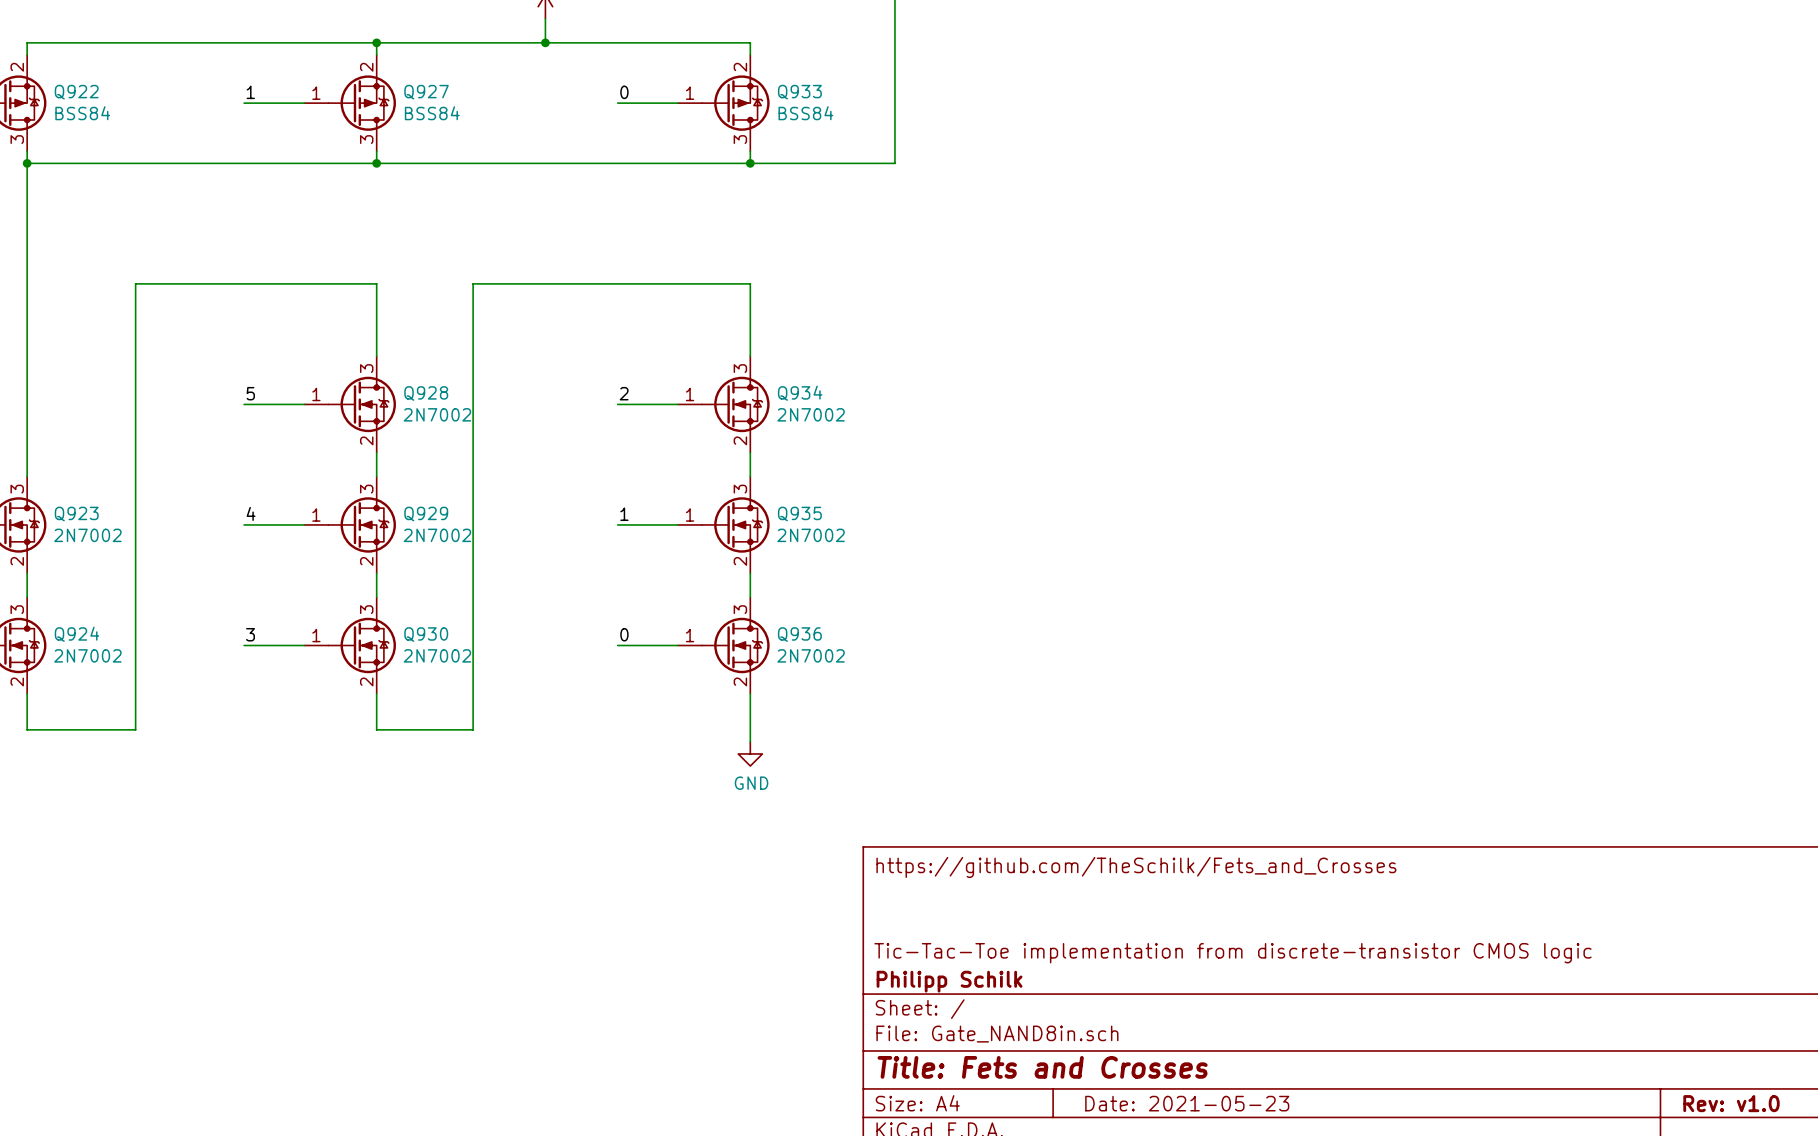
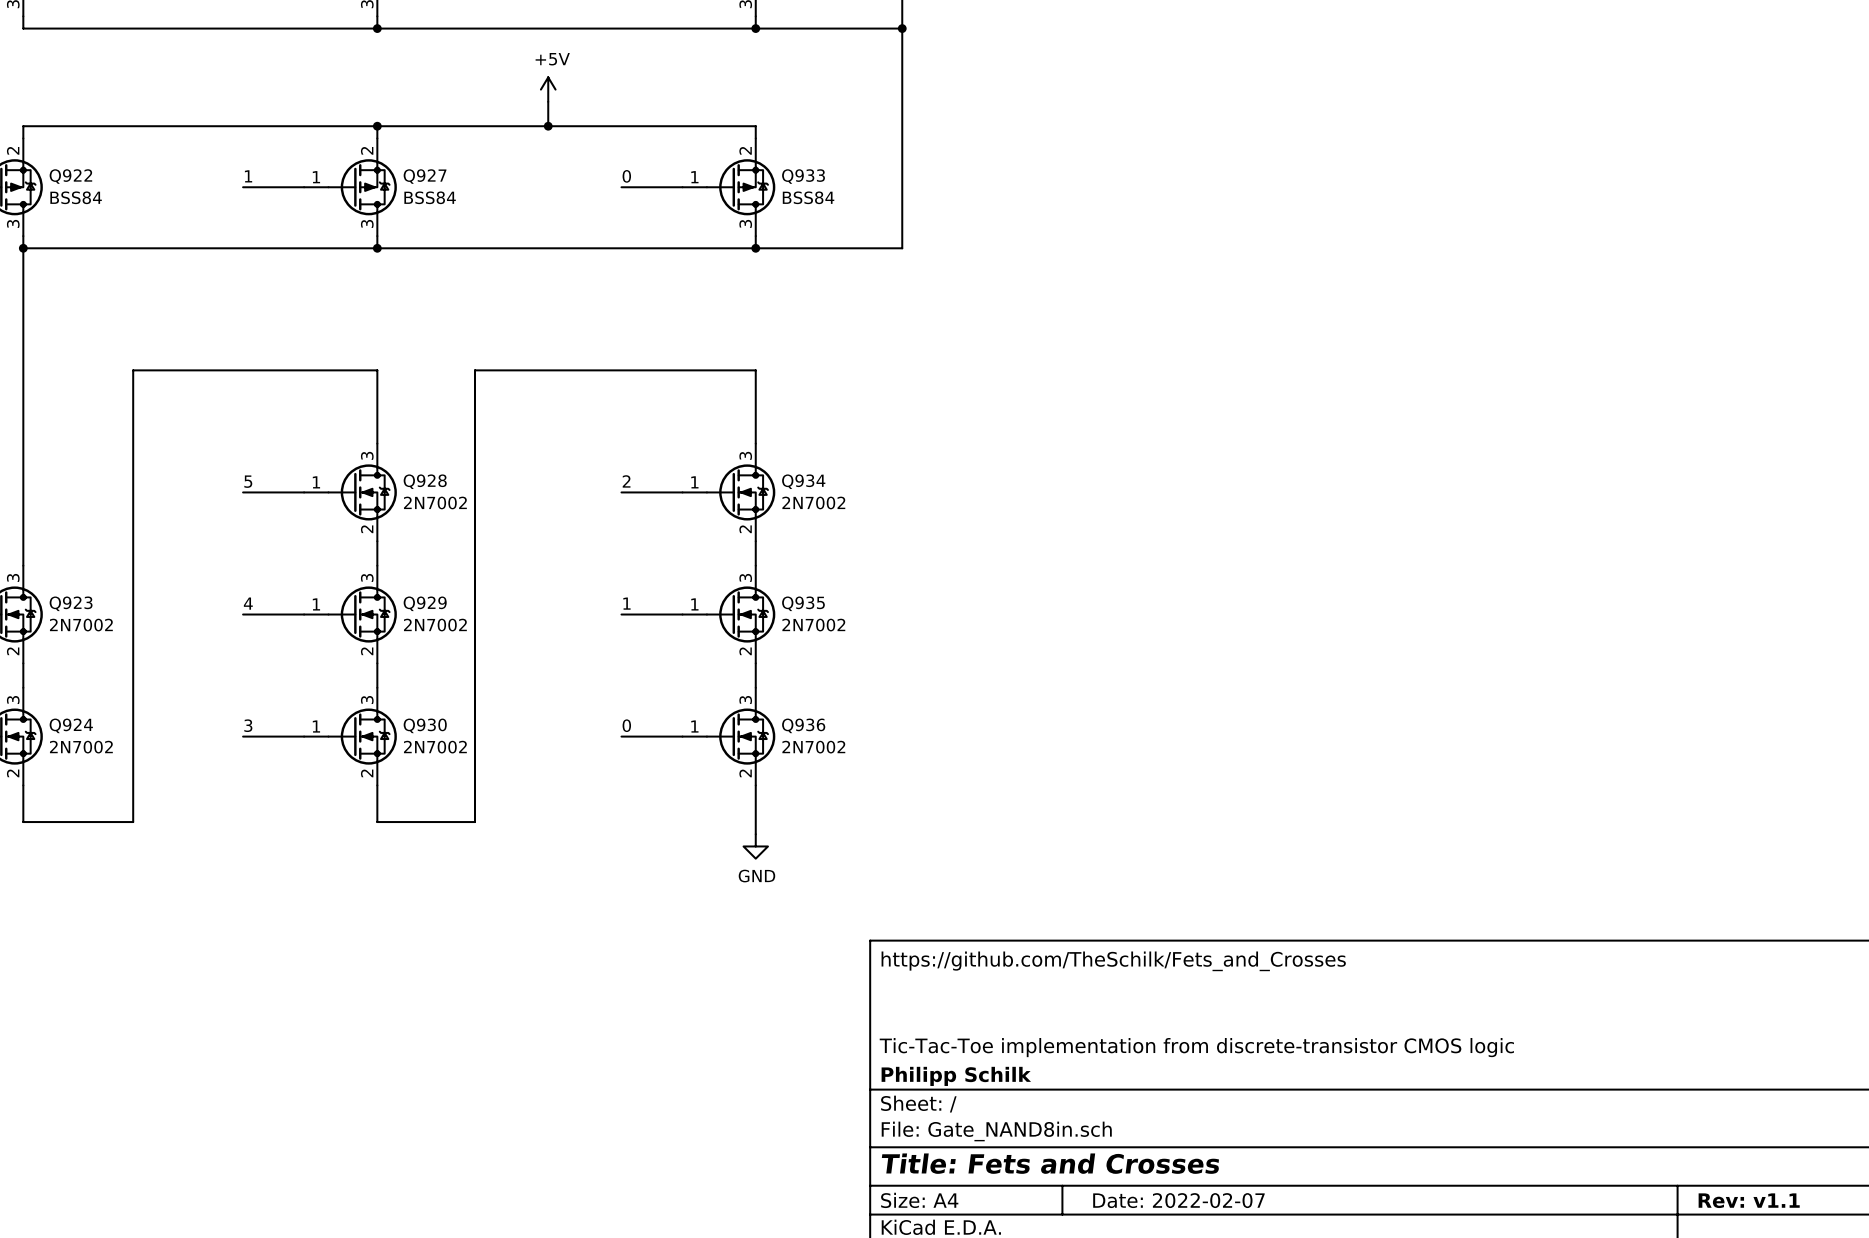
title block: Date: 2021-05-23 (1187, 1103) -> Date: 2022-02-07 (1178, 1200)
title block: Rev: v1.0 (1731, 1103) -> Rev: v1.1 (1749, 1200)

